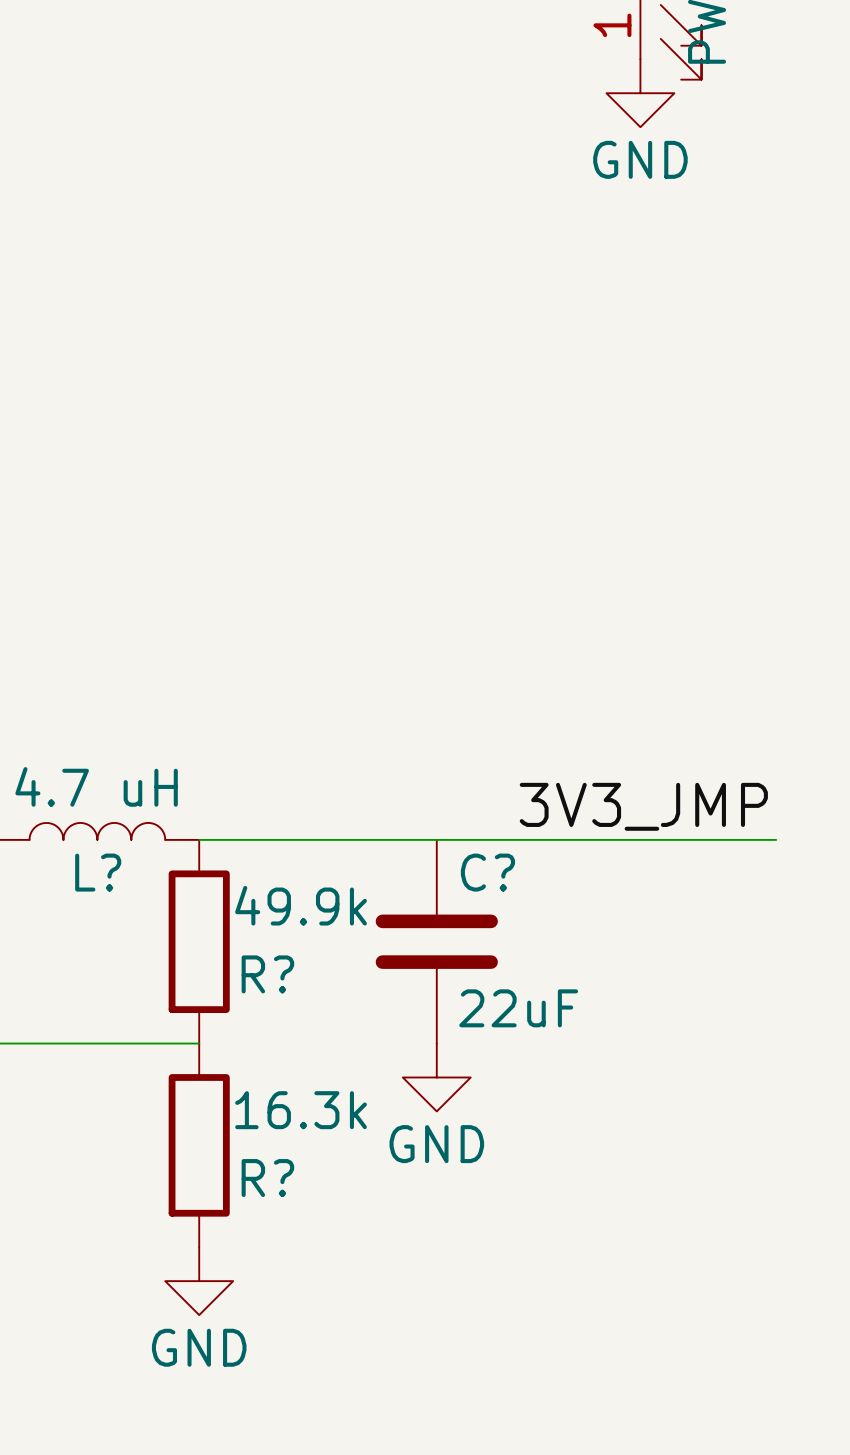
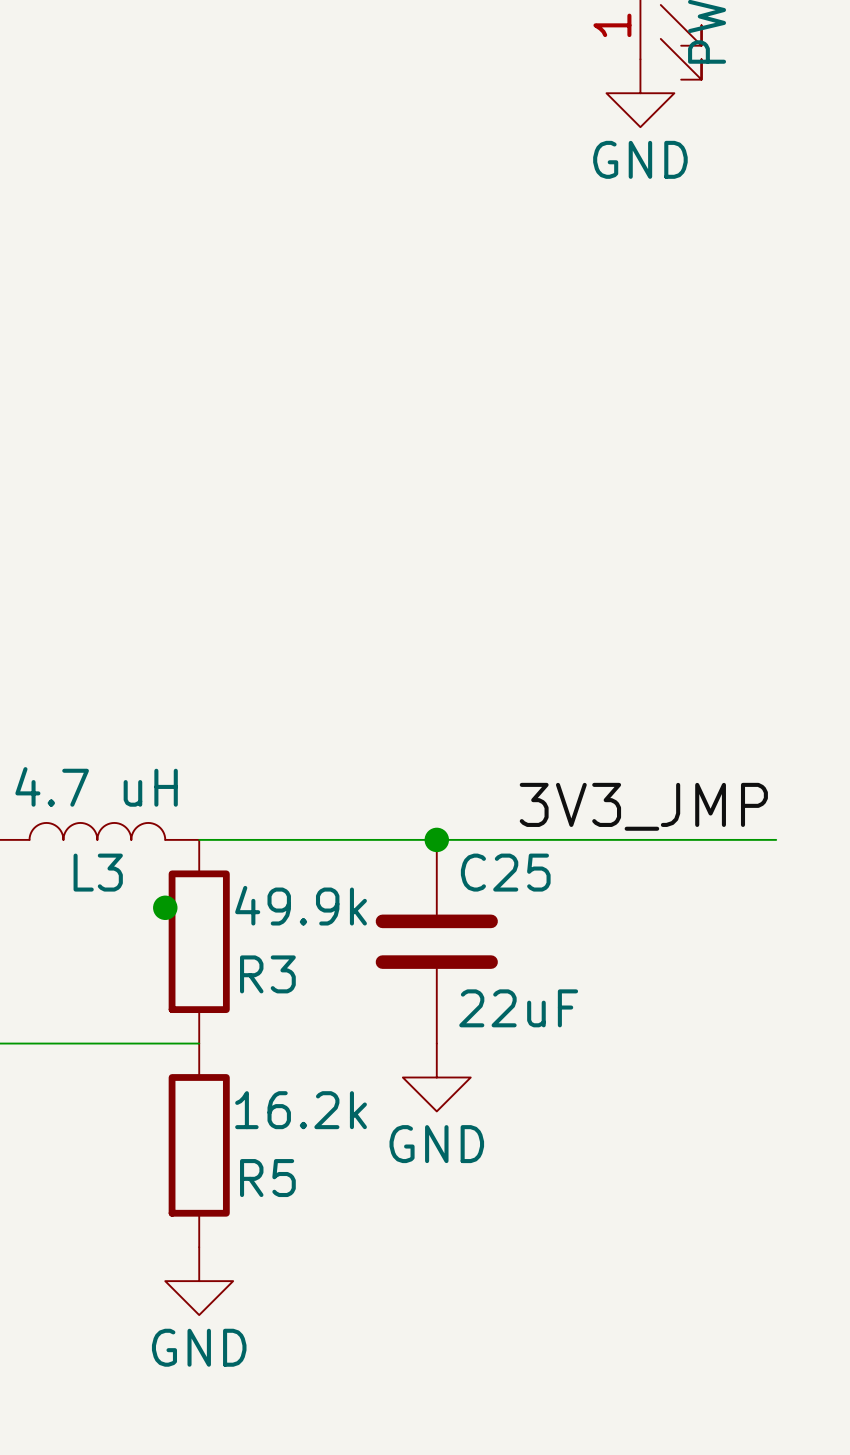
junction: none -> (436, 839)
L? name: L? (98, 872) -> L3 (98, 872)
C? name: C? (487, 872) -> C25 (505, 872)
junction: none -> (165, 907)
R? name: R? (267, 974) -> R3 (267, 974)
R? value: 16.3k (301, 1110) -> 16.2k (301, 1110)
R? name: R? (267, 1178) -> R5 (267, 1178)

